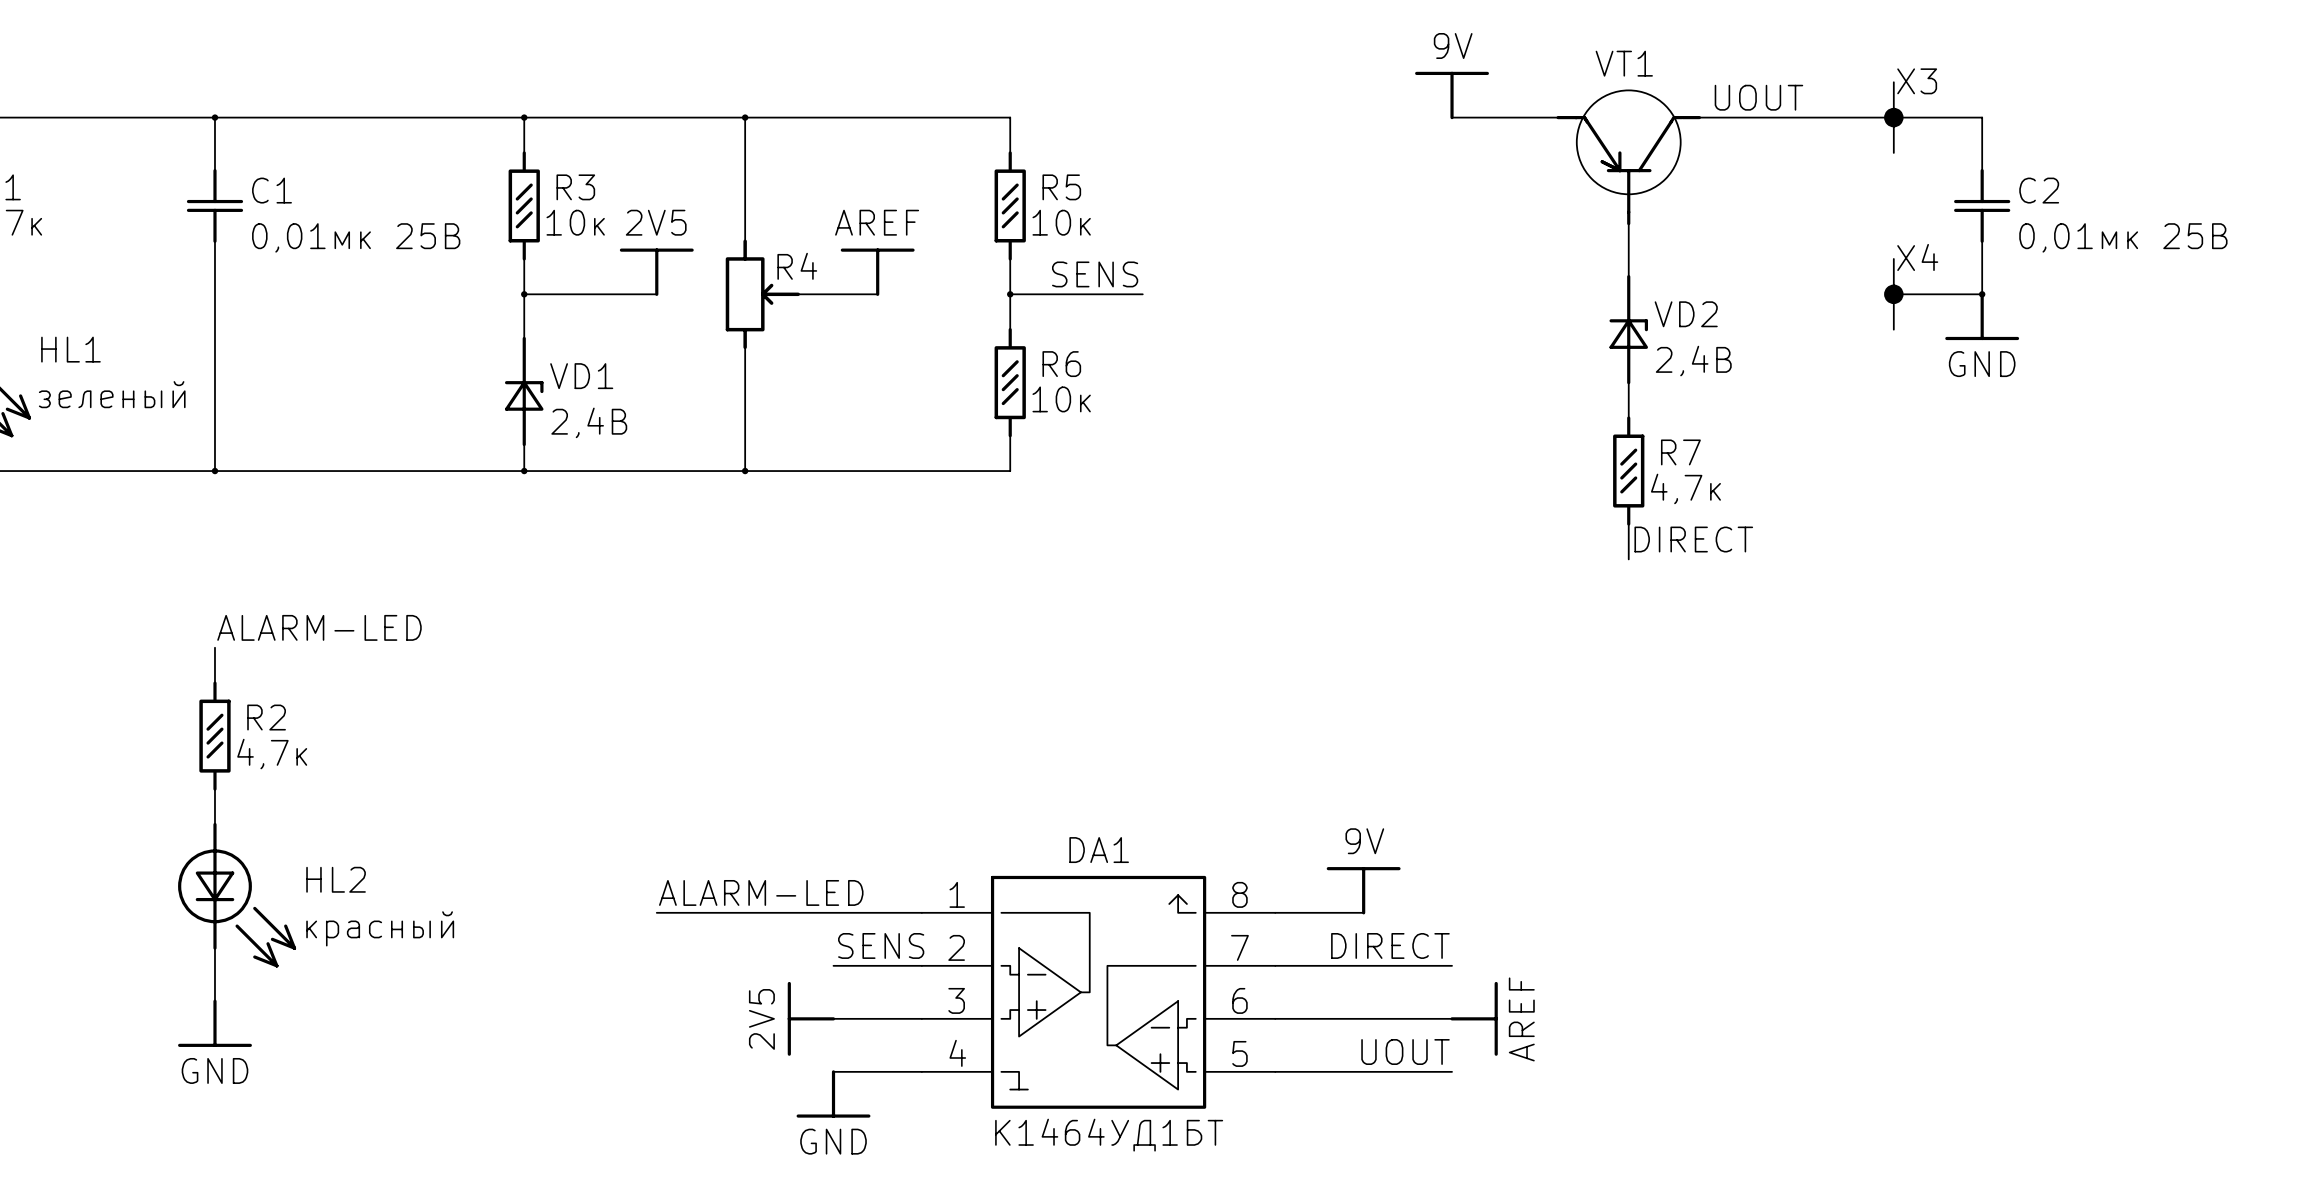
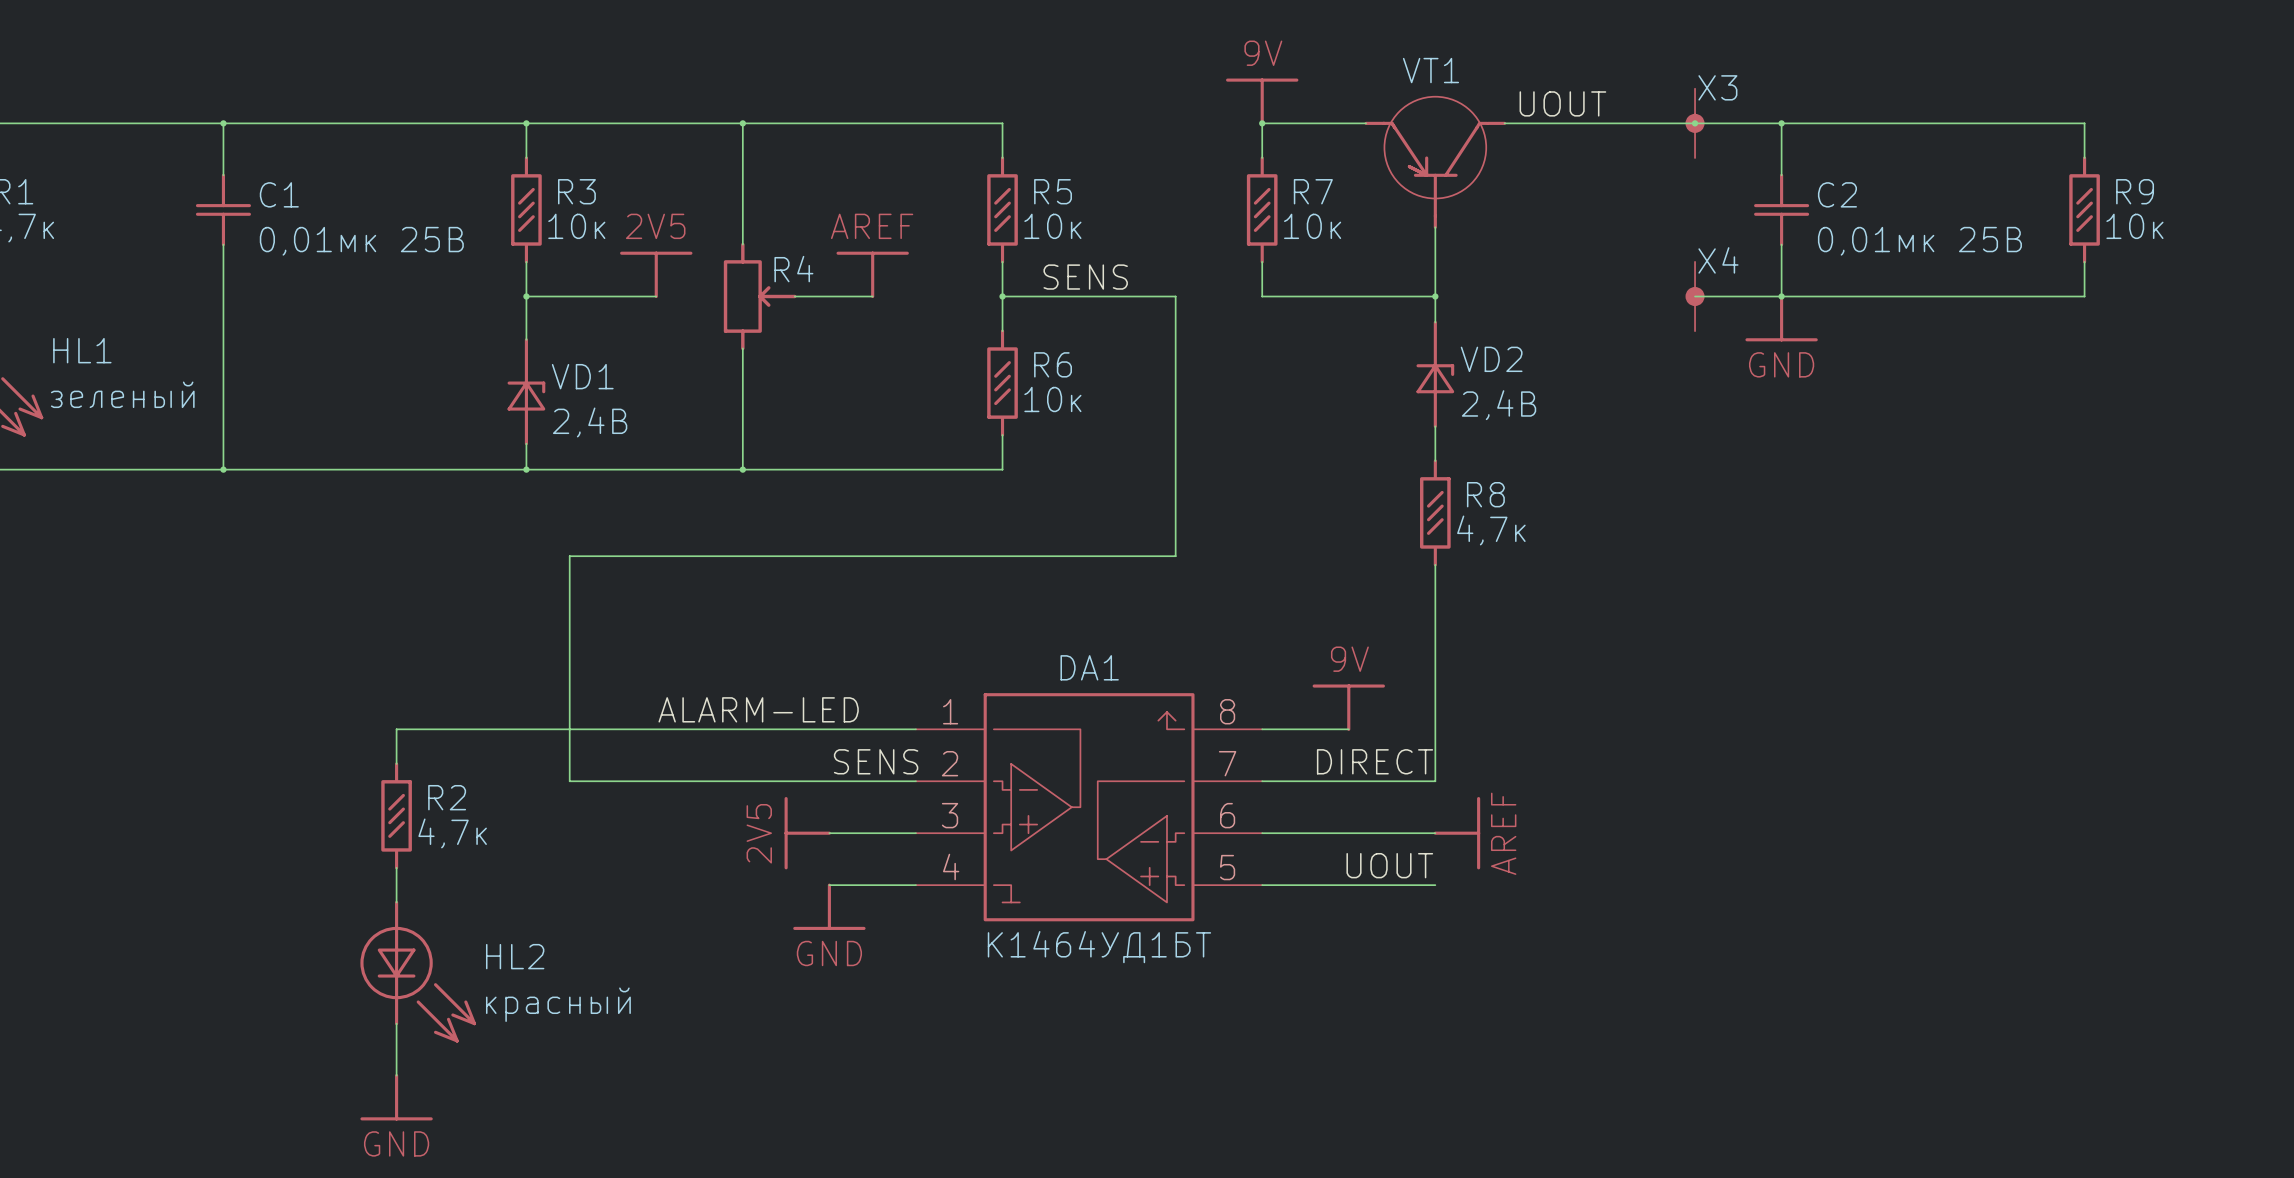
power symbol: none -> (1262, 101)
power symbol: (1452, 95) -> none
label: none -> UOUT (1562, 103)
label: UOUT (1758, 97) -> none
junction: none -> (1262, 123)
wire: none -> (1366, 123) (1262, 123) (1262, 158)
wire: (1452, 117) (1522, 117) -> none
wire: none -> (1539, 123) (1677, 123)
junction: none -> (1695, 123)
wire: none -> (1781, 123) (1781, 175)
junction: none -> (1781, 123)
X3 position: (1893, 117) -> (1695, 123)
wire: (1982, 117) (1982, 170) -> (1954, 123) (2084, 123) (2084, 158)
VT1 position: (1628, 157) -> (1435, 162)
C2 position: (1982, 205) -> (1781, 209)
R9: none -> (2084, 209)
wire: none -> (1435, 227) (1435, 322)
wire: (1628, 223) (1628, 276) -> none
wire: none -> (1781, 244) (1781, 296)
wire: (1982, 241) (1982, 294) -> (2084, 261) (2084, 296) (1954, 296)
wire: none -> (1262, 261) (1262, 296) (1435, 296)
wire: none -> (1132, 296) (1175, 296) (1175, 556) (569, 556) (569, 781) (915, 781)
junction: none -> (1435, 296)
wire: none -> (1695, 296) (1868, 296)
junction: none -> (1781, 296)
X4 position: (1893, 294) -> (1695, 296)
junction: (1982, 294) -> none
power symbol: none -> (1781, 318)
power symbol: (1982, 316) -> none
VD2 position: (1628, 329) -> (1435, 374)
wire: (1628, 382) (1628, 418) -> none
wire: none -> (1435, 426) (1435, 460)
R7 position: (1628, 471) -> (1262, 209)
R7 text: 4,7к (1685, 488) -> 10к (1312, 226)
R8: none -> (1435, 512)
wire: (1628, 524) (1628, 559) -> none
label: DIRECT (1693, 539) -> none
wire: none -> (1435, 564) (1435, 781) (1262, 781)
label: ALARM-LED (319, 627) -> none
wire: (214, 647) (214, 683) -> none
power symbol: none -> (1348, 707)
label: none -> ALARM-LED (758, 709)
R2 position: (214, 736) -> (396, 815)
wire: none -> (915, 729) (396, 729) (396, 763)
wire: none -> (1262, 729) (1348, 729)
label: none -> SENS (876, 761)
label: none -> DIRECT (1375, 761)
wire: (214, 789) (214, 824) -> none
power symbol: none -> (807, 833)
power symbol: none -> (1456, 833)
label: none -> UOUT (1389, 865)
wire: none -> (396, 867) (396, 902)
power symbol: (1363, 890) -> none
label: ALARM-LED (761, 892) -> none
HL2 position: (237, 895) -> (418, 971)
wire: (656, 912) (921, 912) -> none
wire: (1275, 912) (1363, 912) -> none
power symbol: none -> (829, 906)
label: SENS (881, 945) -> none
label: DIRECT (1390, 945) -> none
wire: (214, 948) (214, 1001) -> none
wire: (833, 965) (921, 965) -> (829, 833) (915, 833)
wire: (1275, 965) (1452, 965) -> (1262, 833) (1435, 833)
DA1 position: (1098, 992) -> (1089, 807)
power symbol: (811, 1018) -> none
wire: (833, 1018) (921, 1018) -> (829, 885) (915, 885)
wire: (1275, 1018) (1452, 1018) -> (1262, 885) (1435, 885)
power symbol: (1474, 1018) -> none
power symbol: (214, 1023) -> none
wire: none -> (396, 1023) (396, 1075)
label: UOUT (1405, 1052) -> none
wire: (833, 1071) (921, 1071) -> none
wire: (1275, 1071) (1452, 1071) -> none
power symbol: (833, 1093) -> none
power symbol: none -> (396, 1097)

